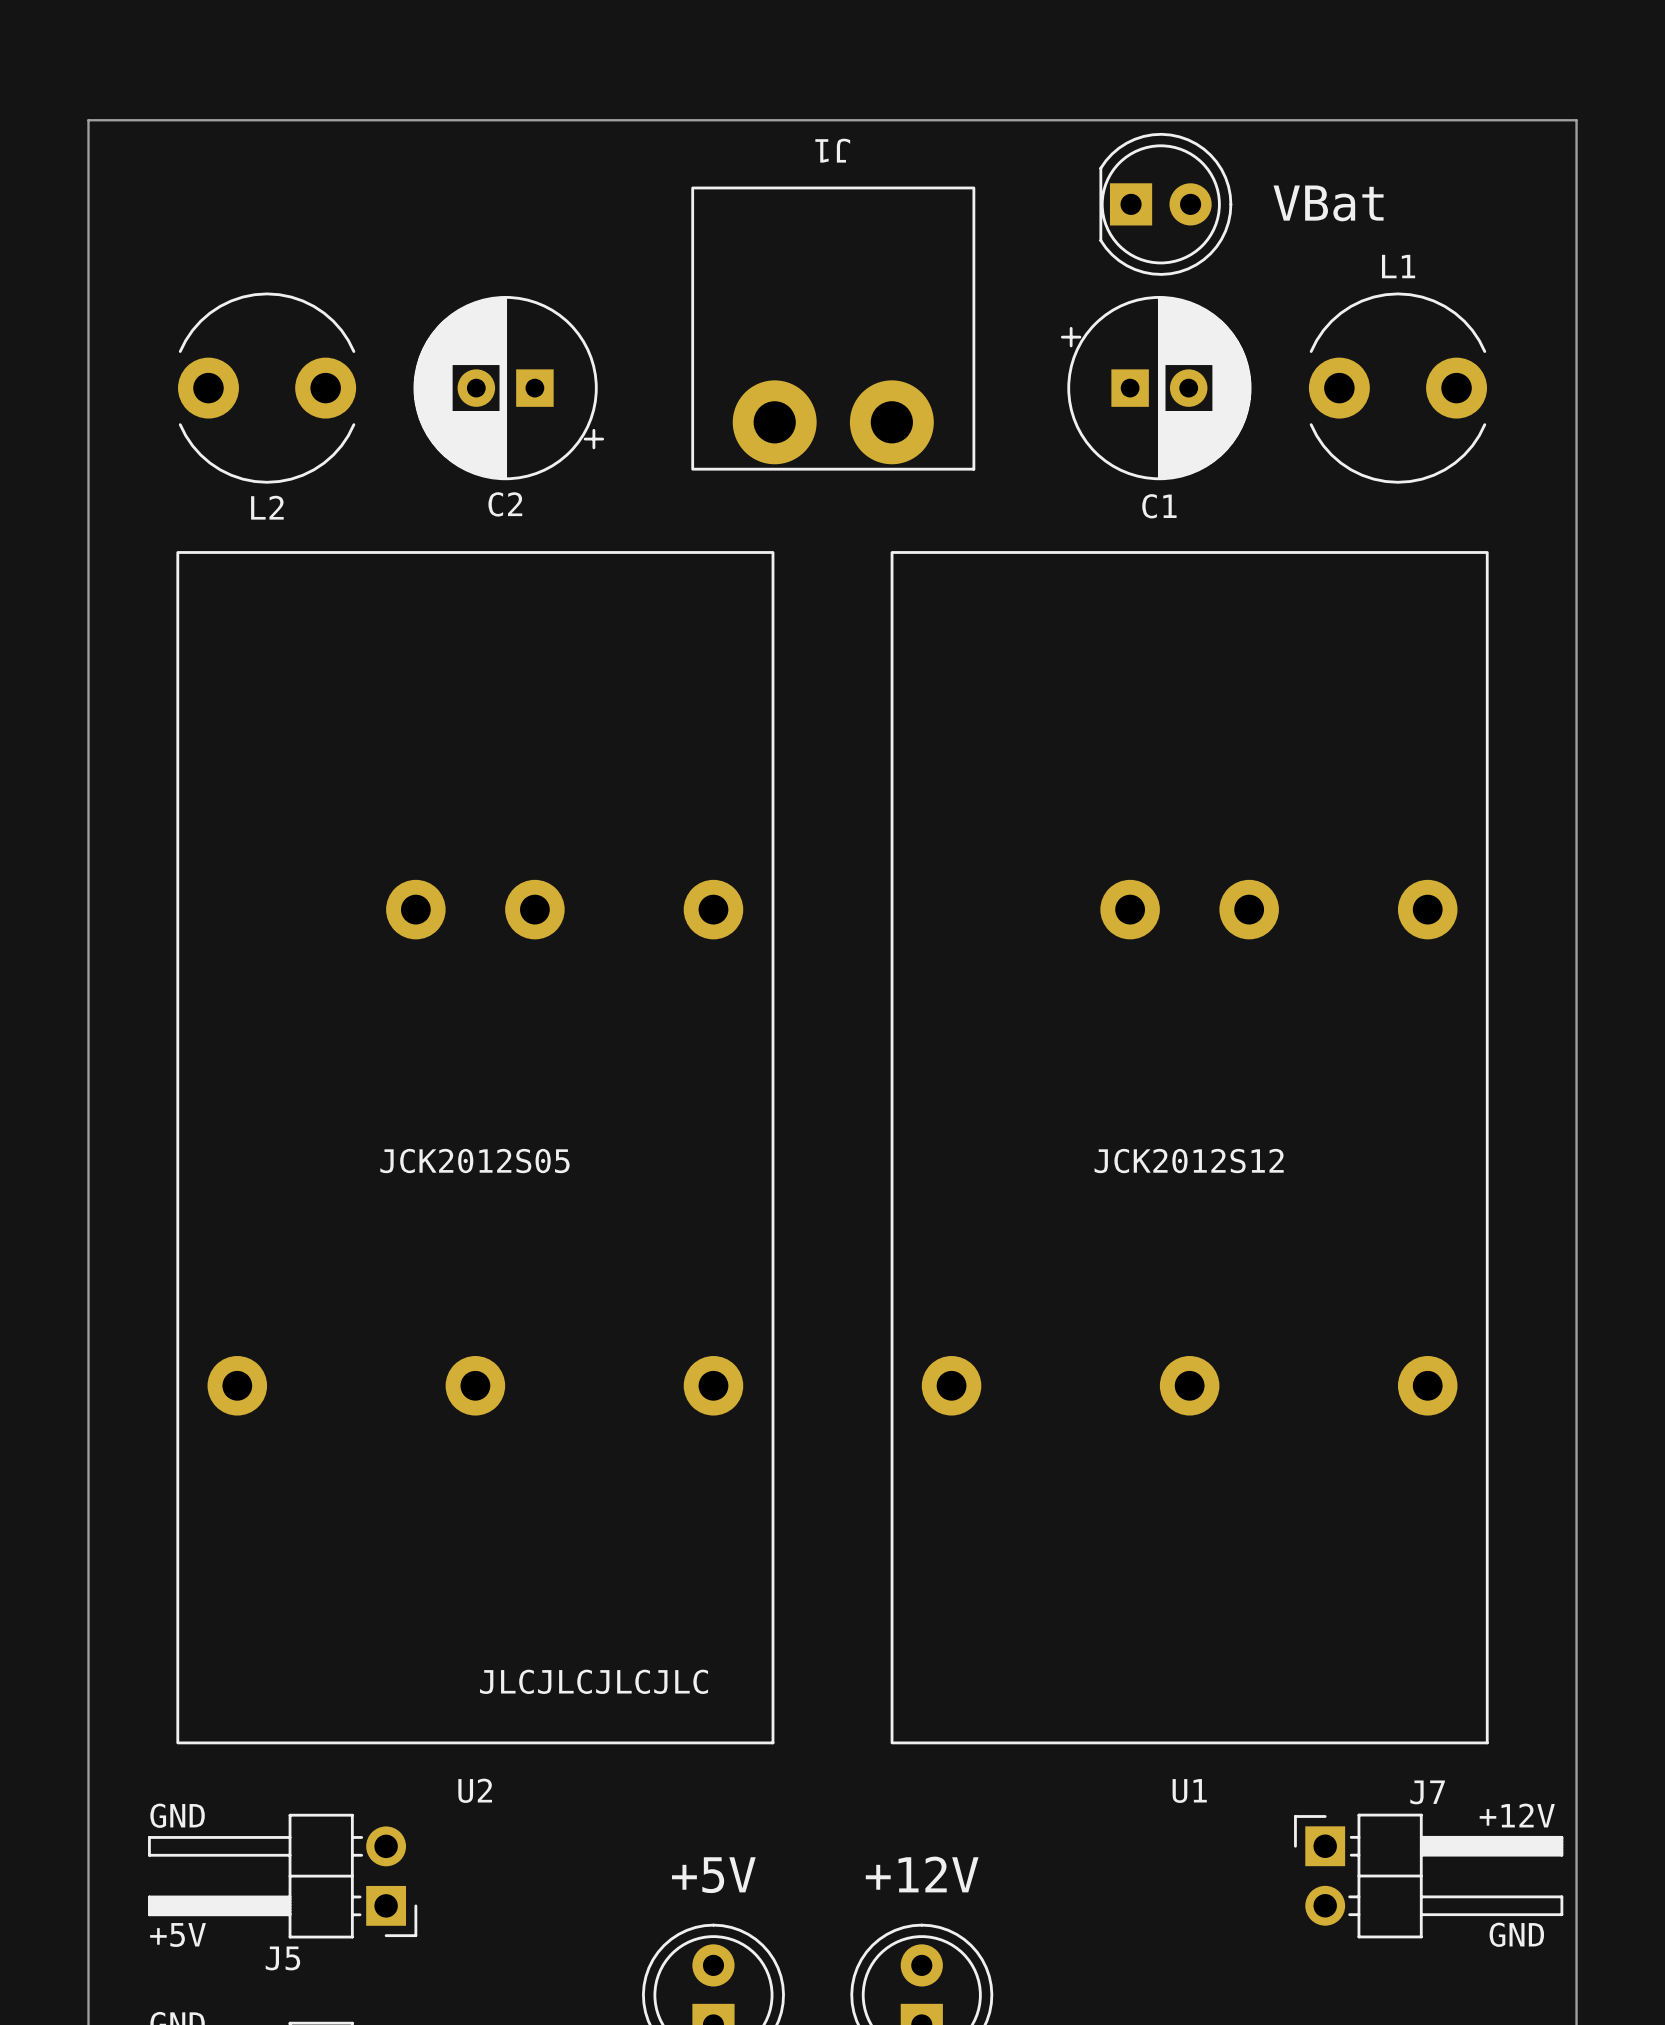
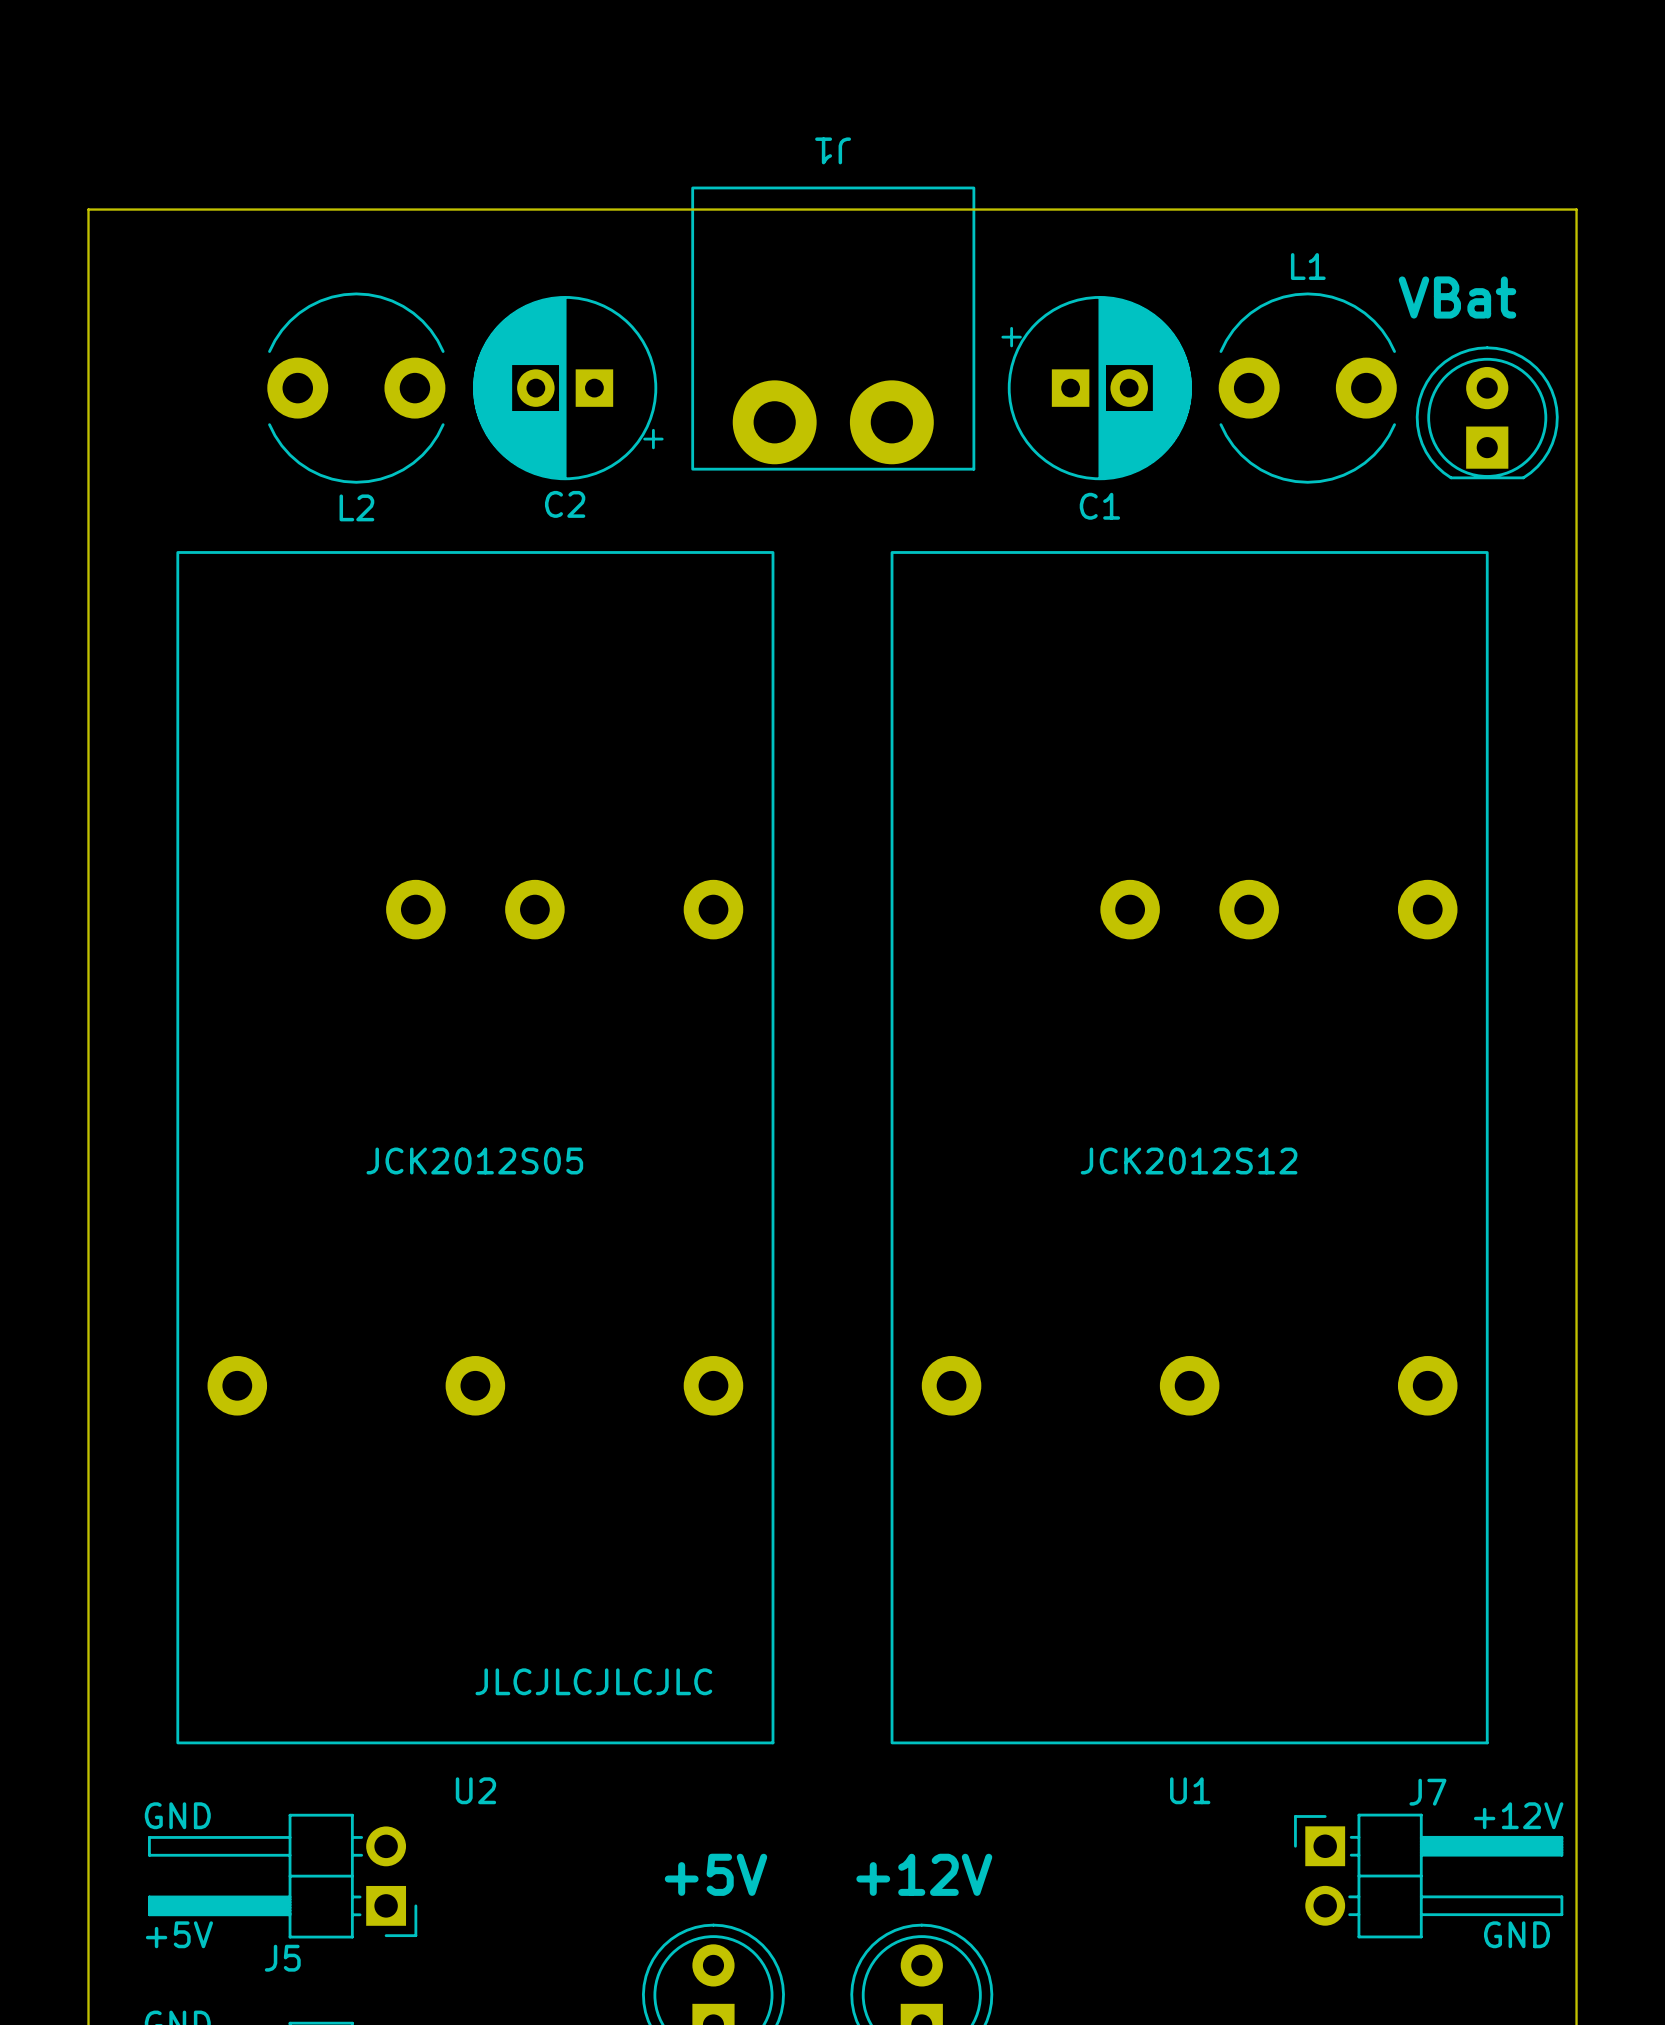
text position: VBat (1328, 203) -> VBat (1457, 297)
part rotation: 0° (1165, 204) -> 90° counterclockwise (1487, 412)
part position: (1165, 204) -> (1487, 412)
board edge: (88, 209) (88, 120) (1576, 120) (1576, 209) -> (88, 209) (1576, 209)
L2 position: (267, 388) -> (356, 388)
C2 position: (508, 388) -> (568, 388)
C1 position: (1156, 388) -> (1096, 388)
L1 position: (1397, 388) -> (1307, 388)

